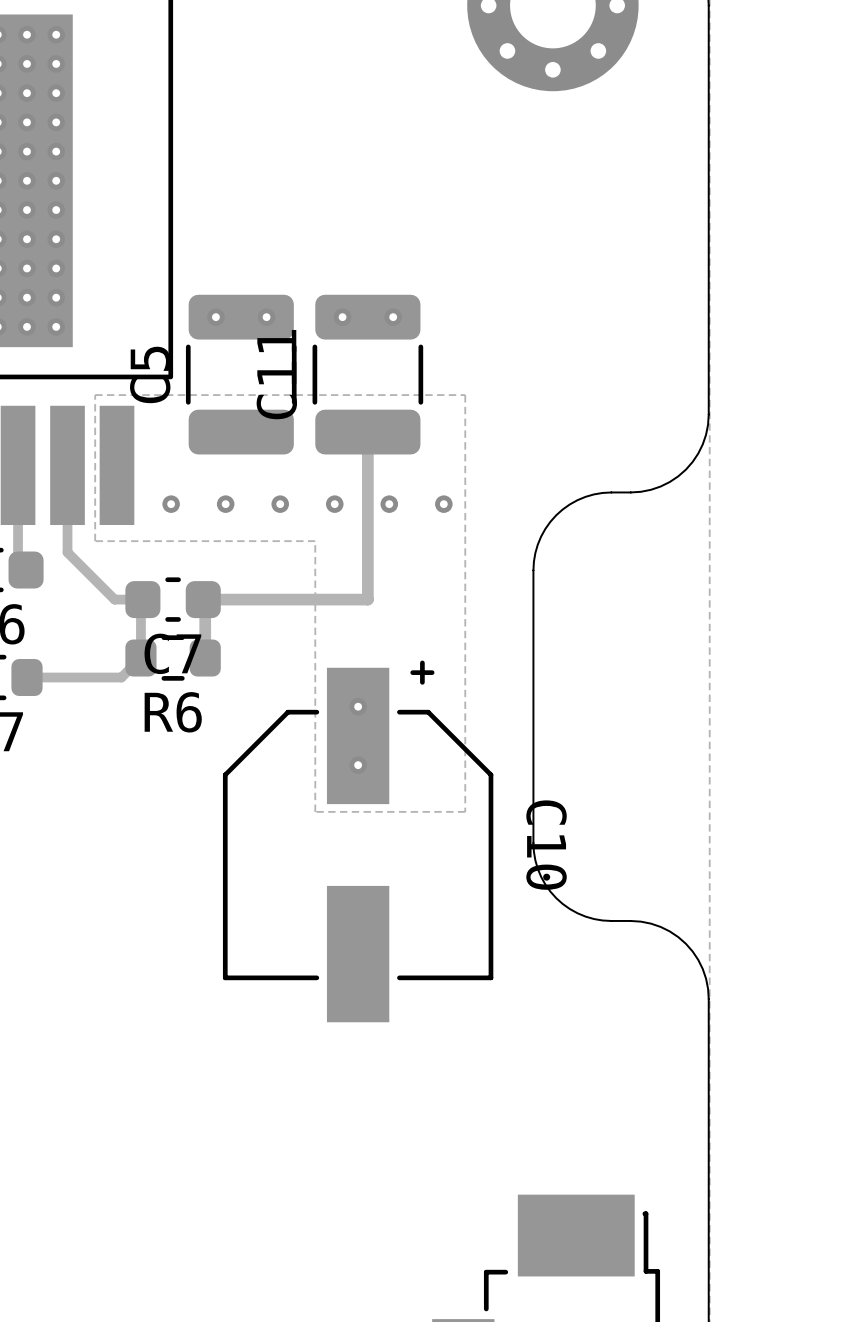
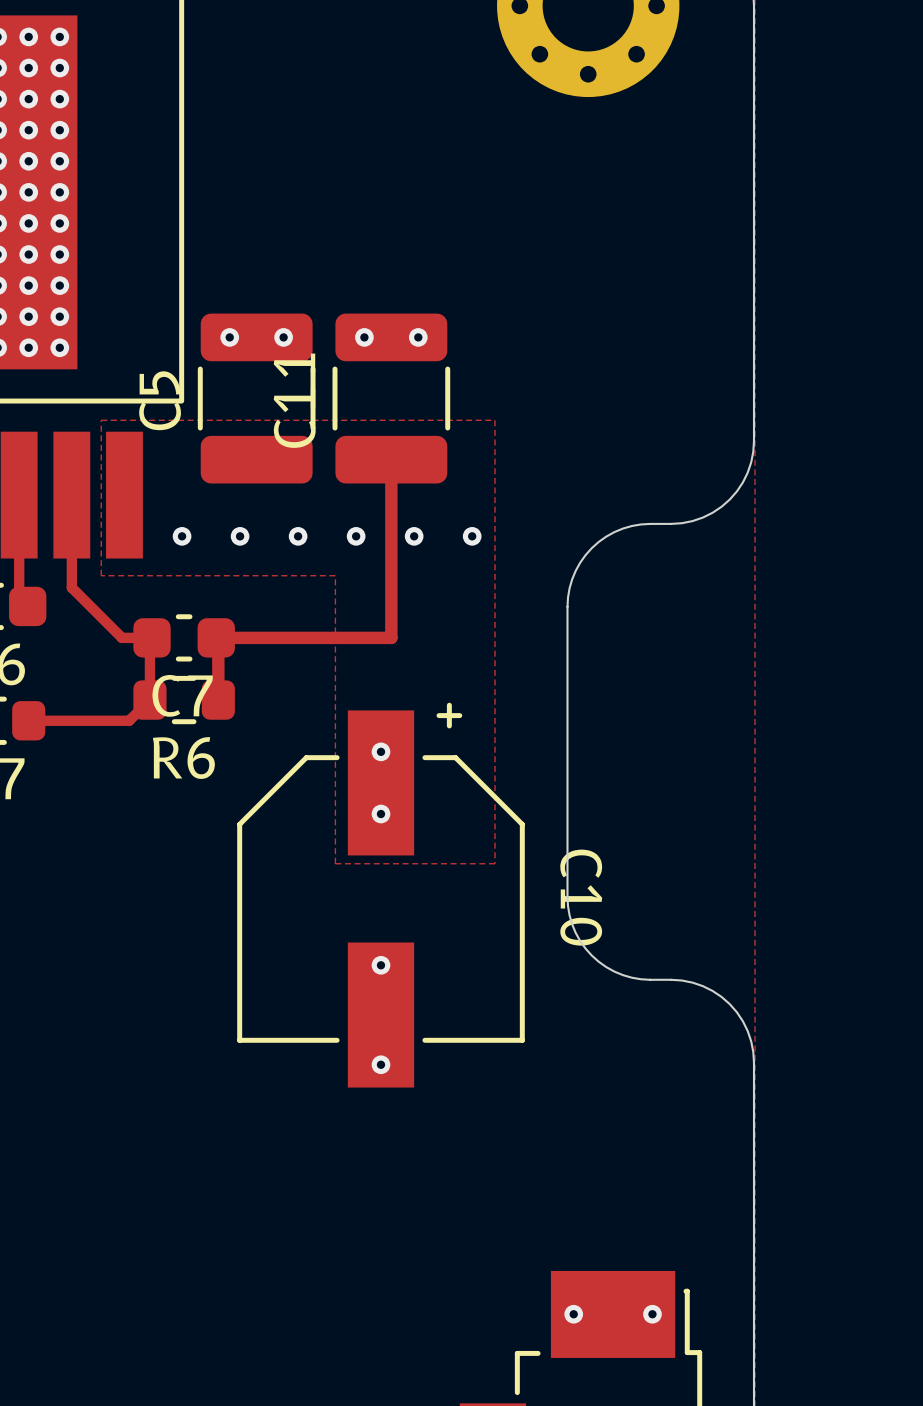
via: none -> (381, 965)
via: none -> (381, 1064)
via: none -> (573, 1314)
via: none -> (652, 1314)

